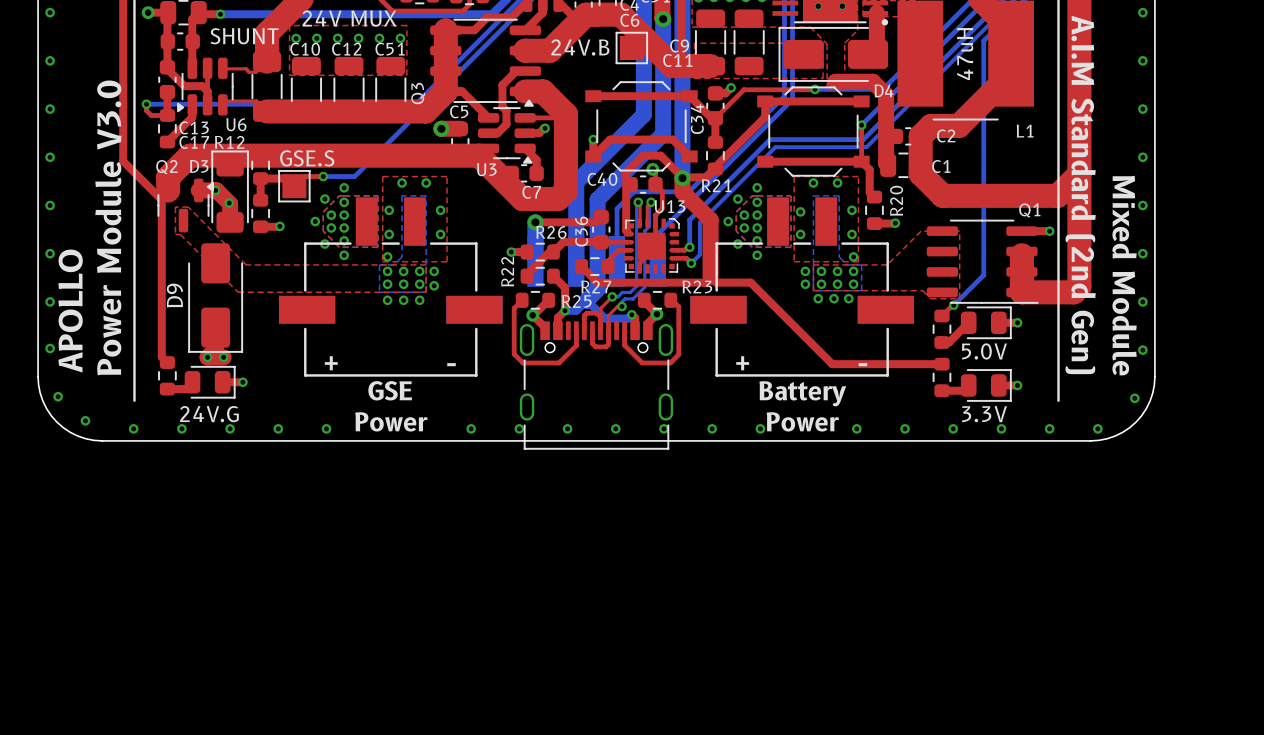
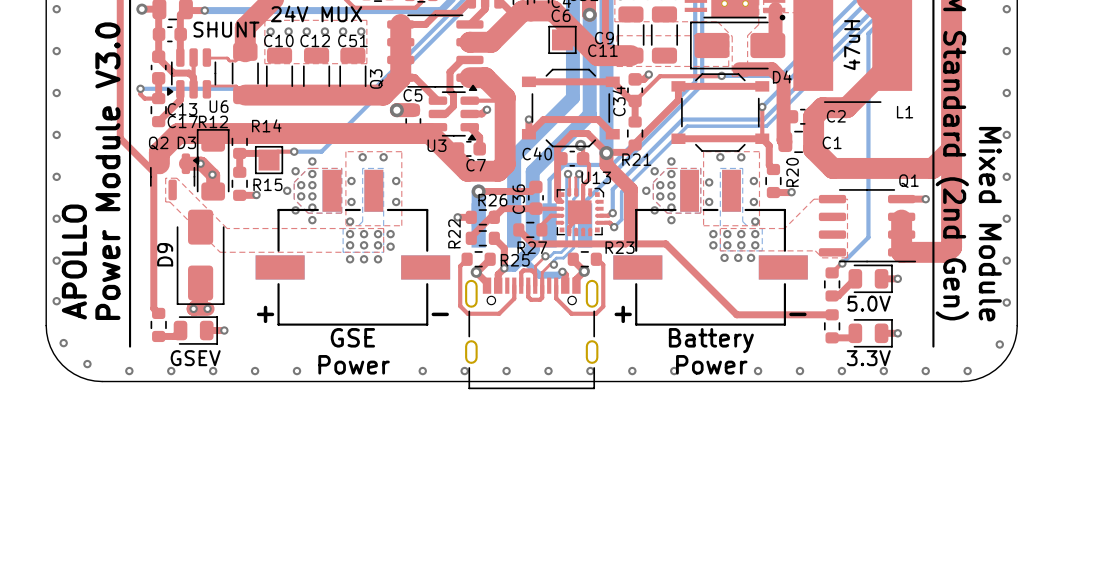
part text: 24V.B (580, 47) -> none
R14 name: none -> R14 (266, 125)
part text: GSE.S (307, 158) -> none
R15 name: none -> R15 (267, 184)
text: 24V.G (209, 414) -> GSEV (195, 358)

